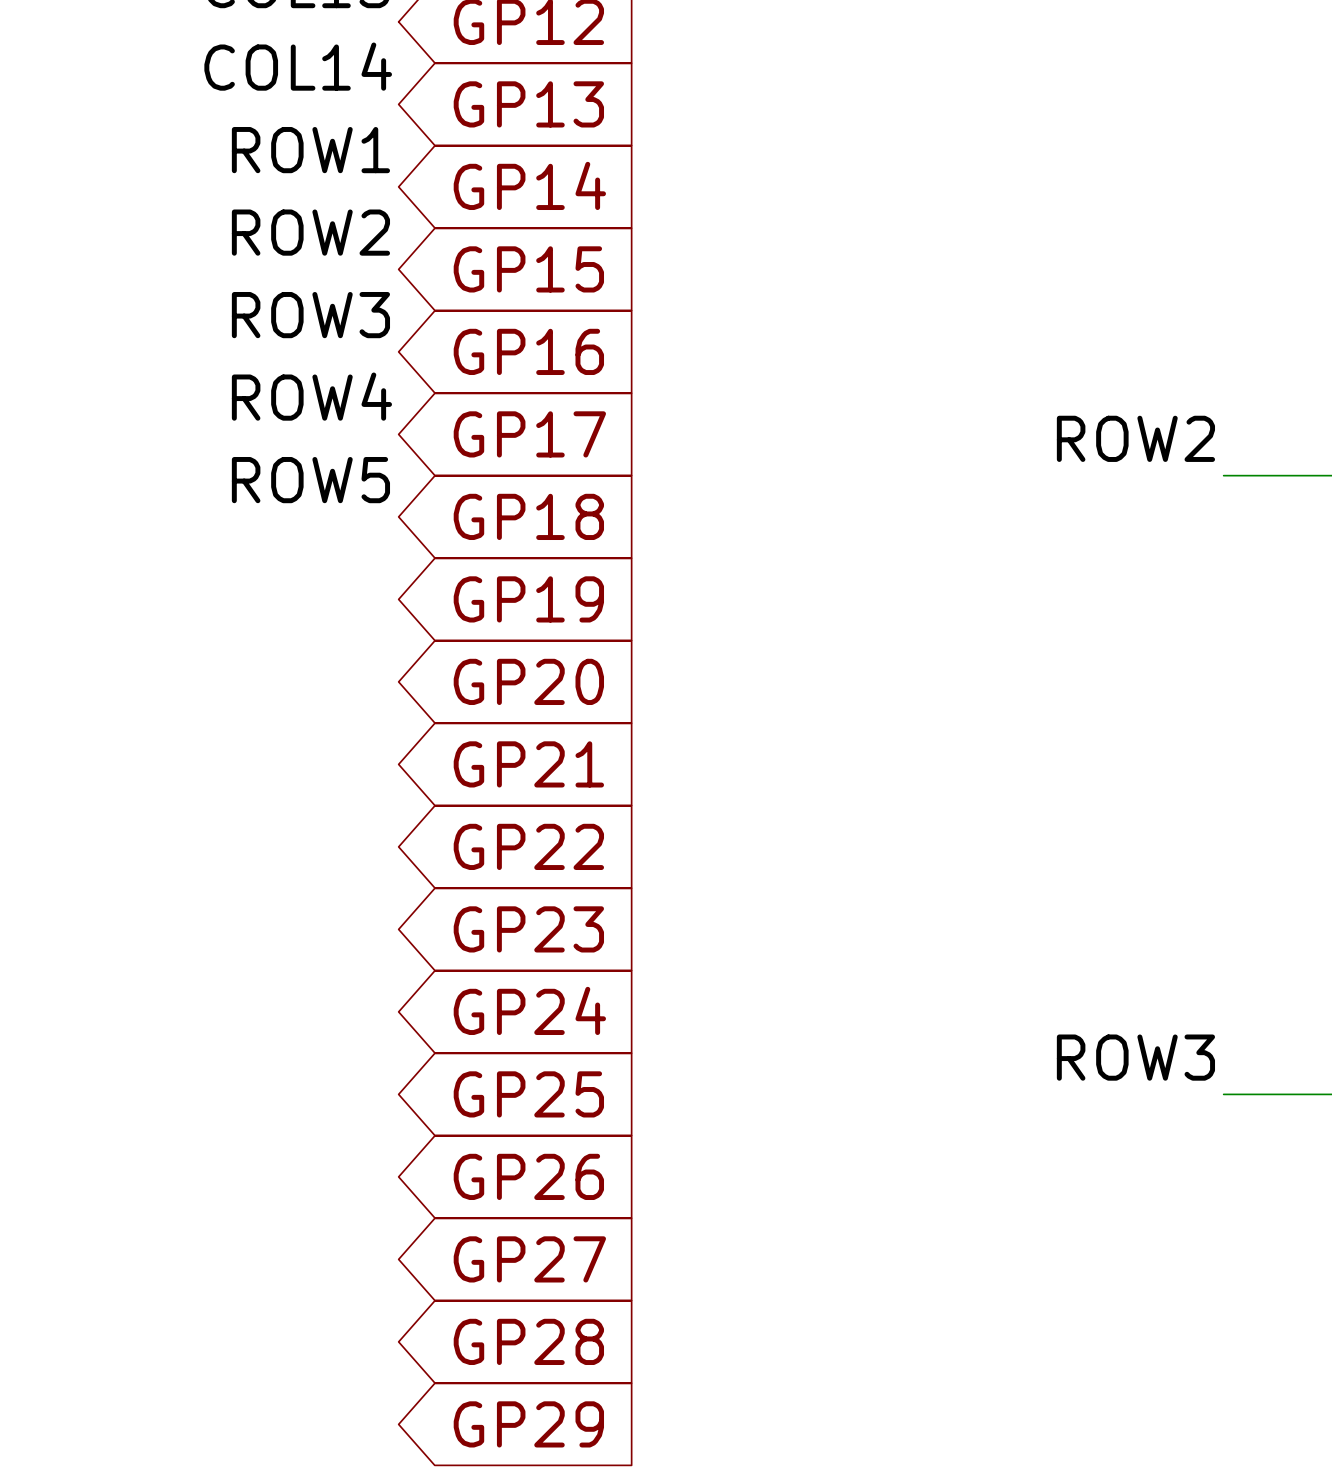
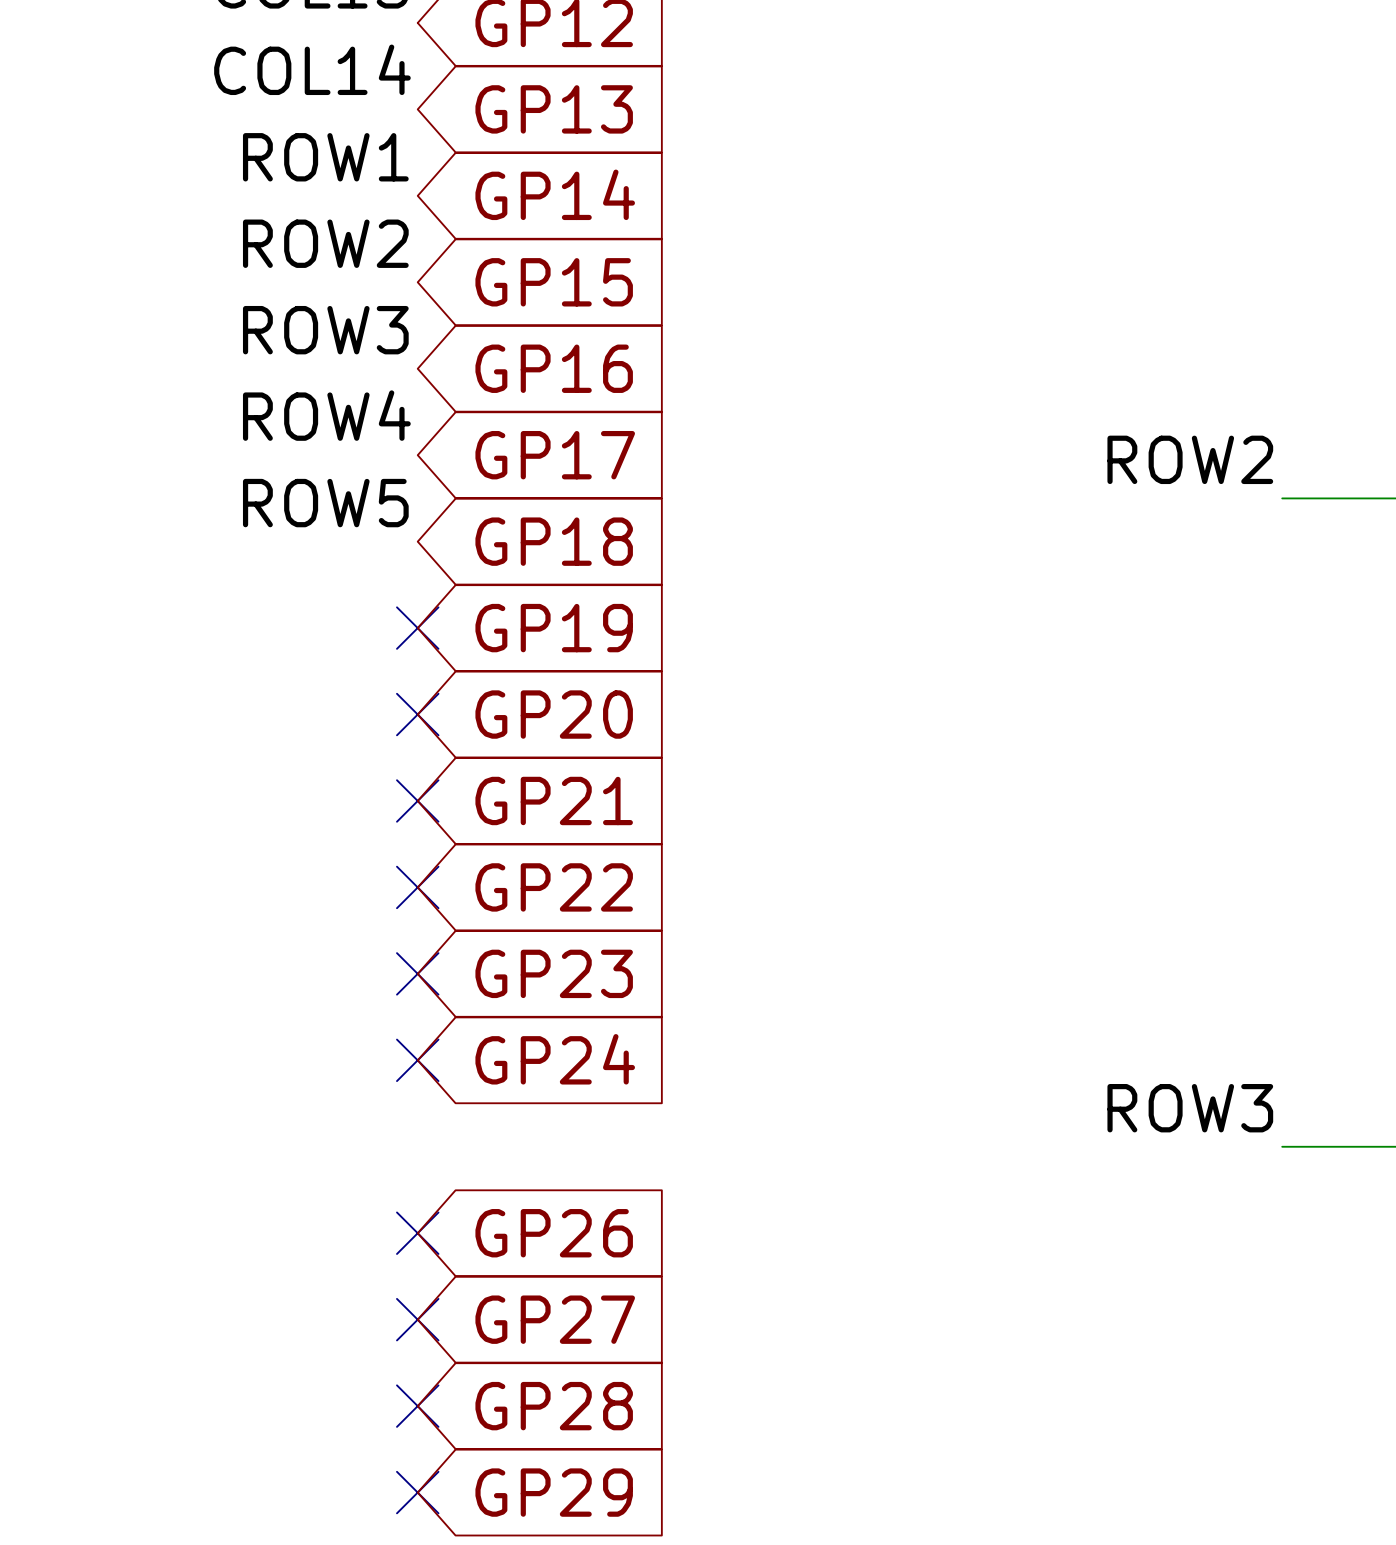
no-connect mark: none -> (417, 628)
no-connect mark: none -> (417, 714)
no-connect mark: none -> (417, 800)
no-connect mark: none -> (417, 887)
no-connect mark: none -> (417, 973)
no-connect mark: none -> (417, 1060)
global label: GP25 (528, 1094) -> none
no-connect mark: none -> (417, 1233)
no-connect mark: none -> (417, 1319)
no-connect mark: none -> (417, 1406)
no-connect mark: none -> (417, 1492)

